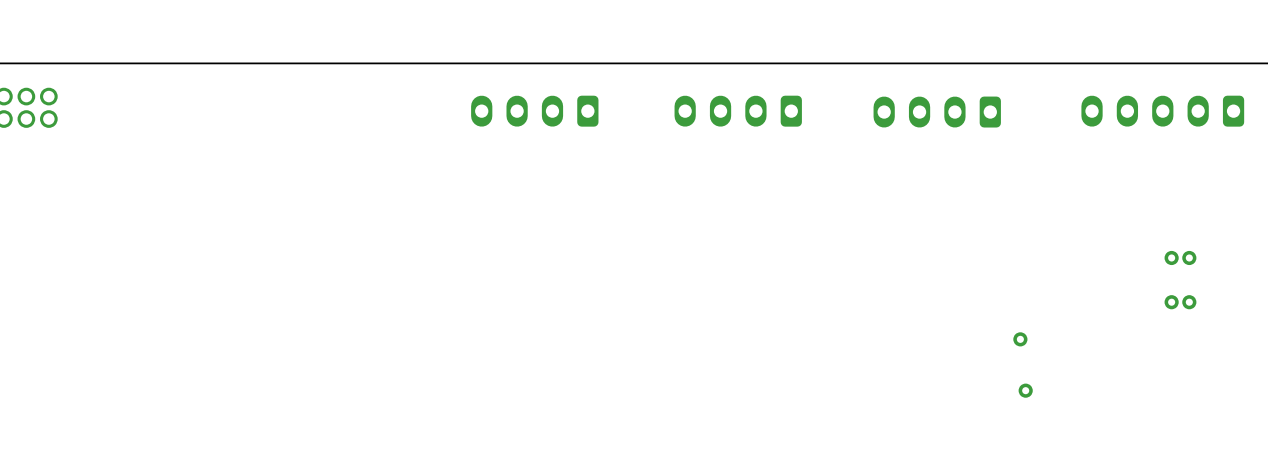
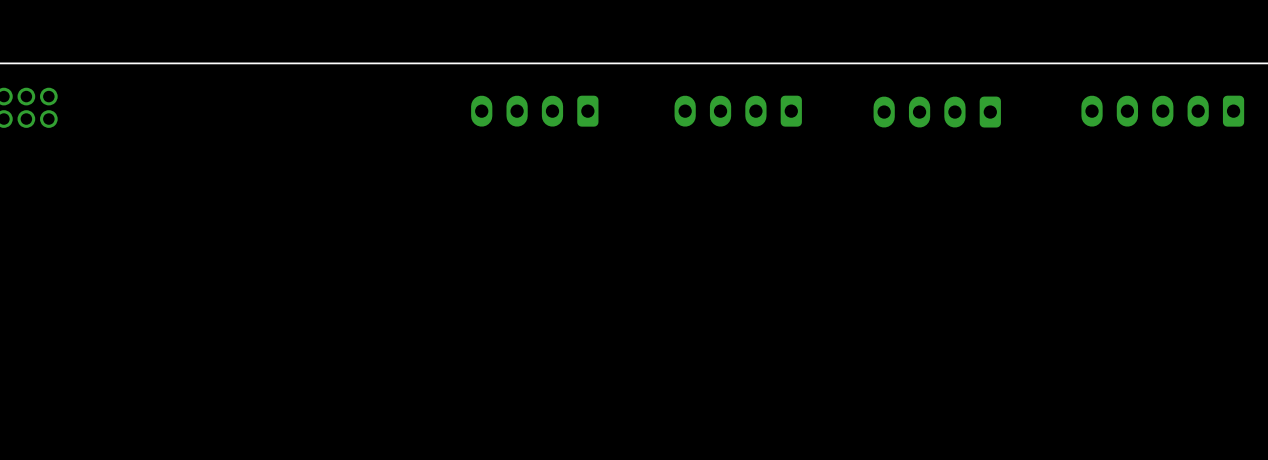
via: (1171, 257) -> none
via: (1189, 257) -> none
via: (1171, 302) -> none
via: (1189, 302) -> none
via: (1020, 339) -> none
via: (1025, 390) -> none

